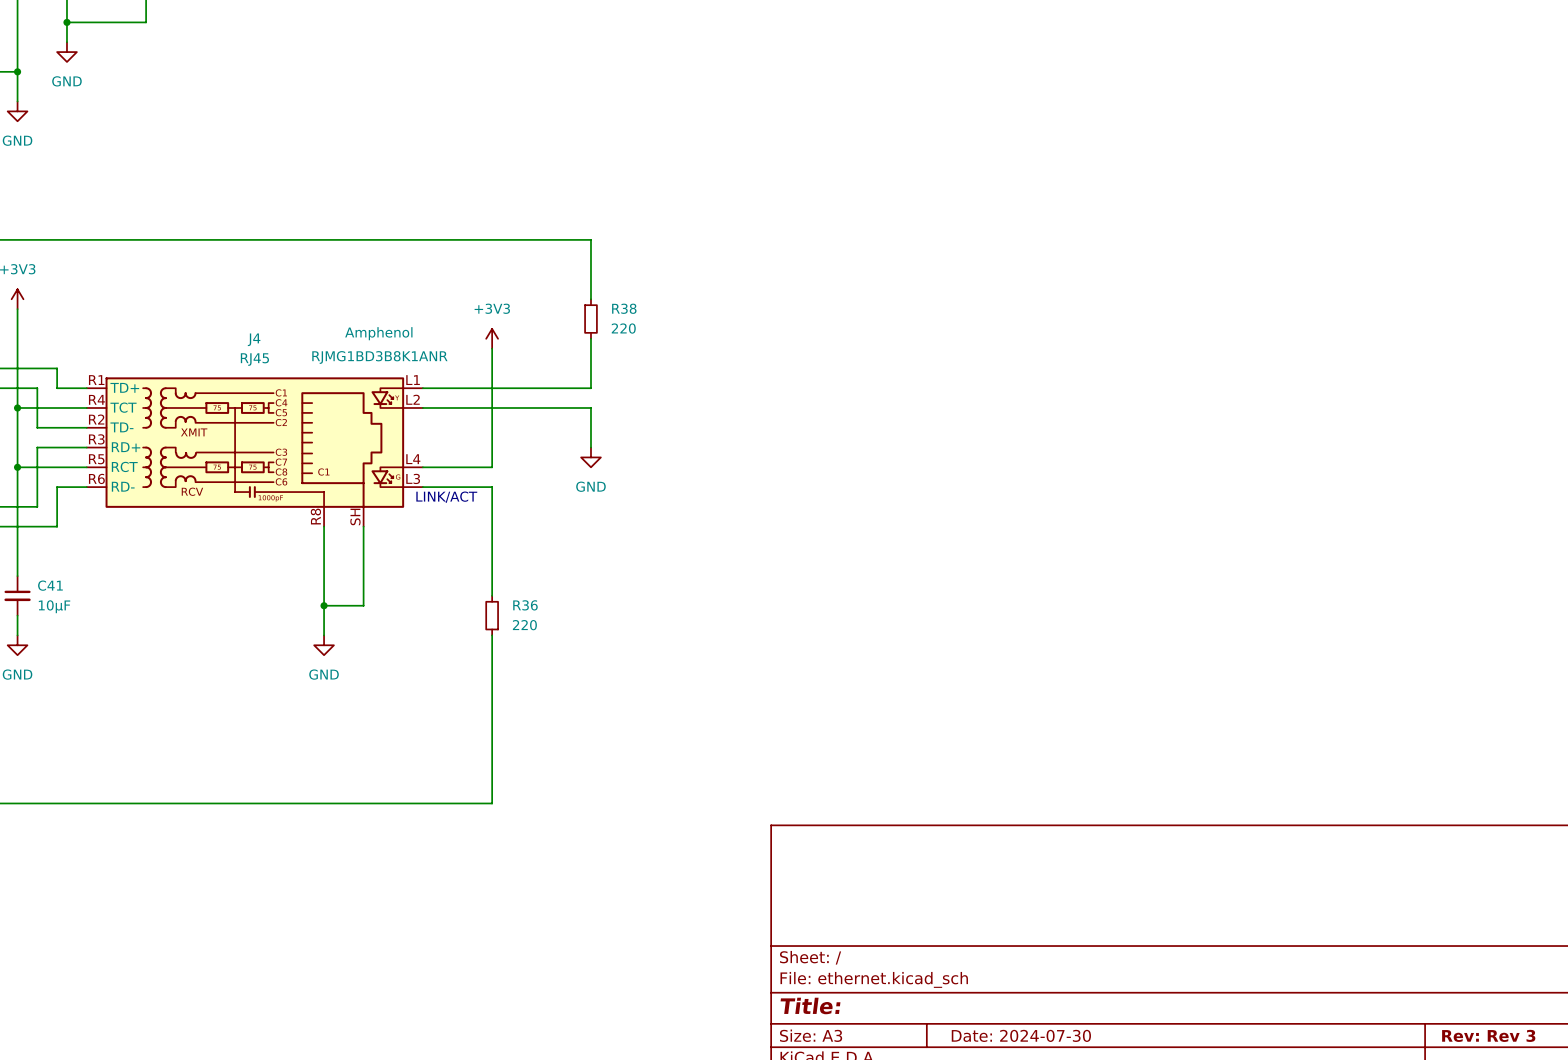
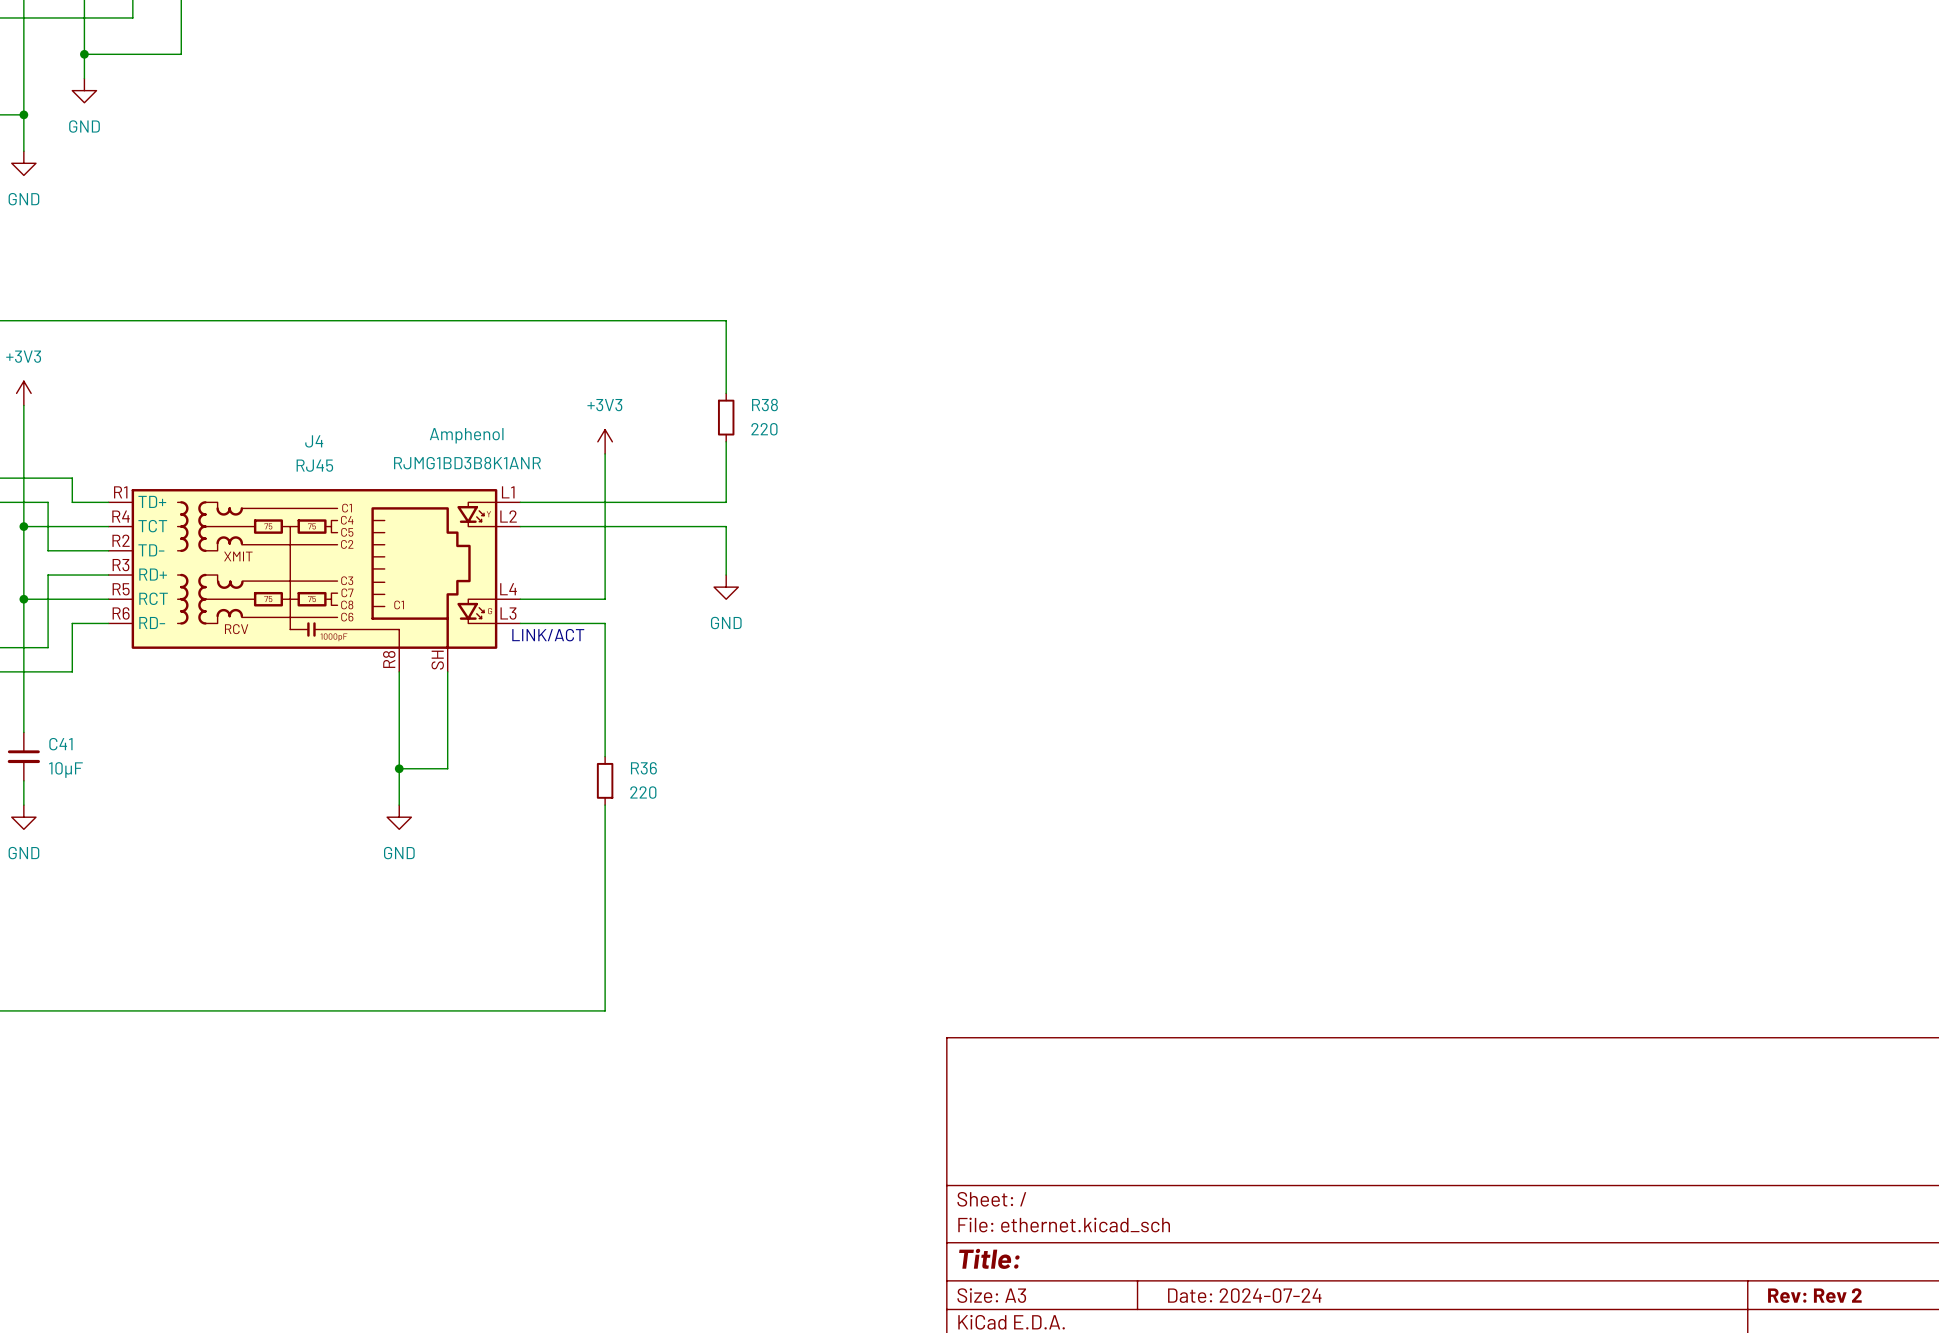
title block: Date: 2024-07-30 (1021, 1035) -> Date: 2024-07-24 (1244, 1295)
title block: Rev: Rev 3 (1488, 1035) -> Rev: Rev 2 (1814, 1295)

